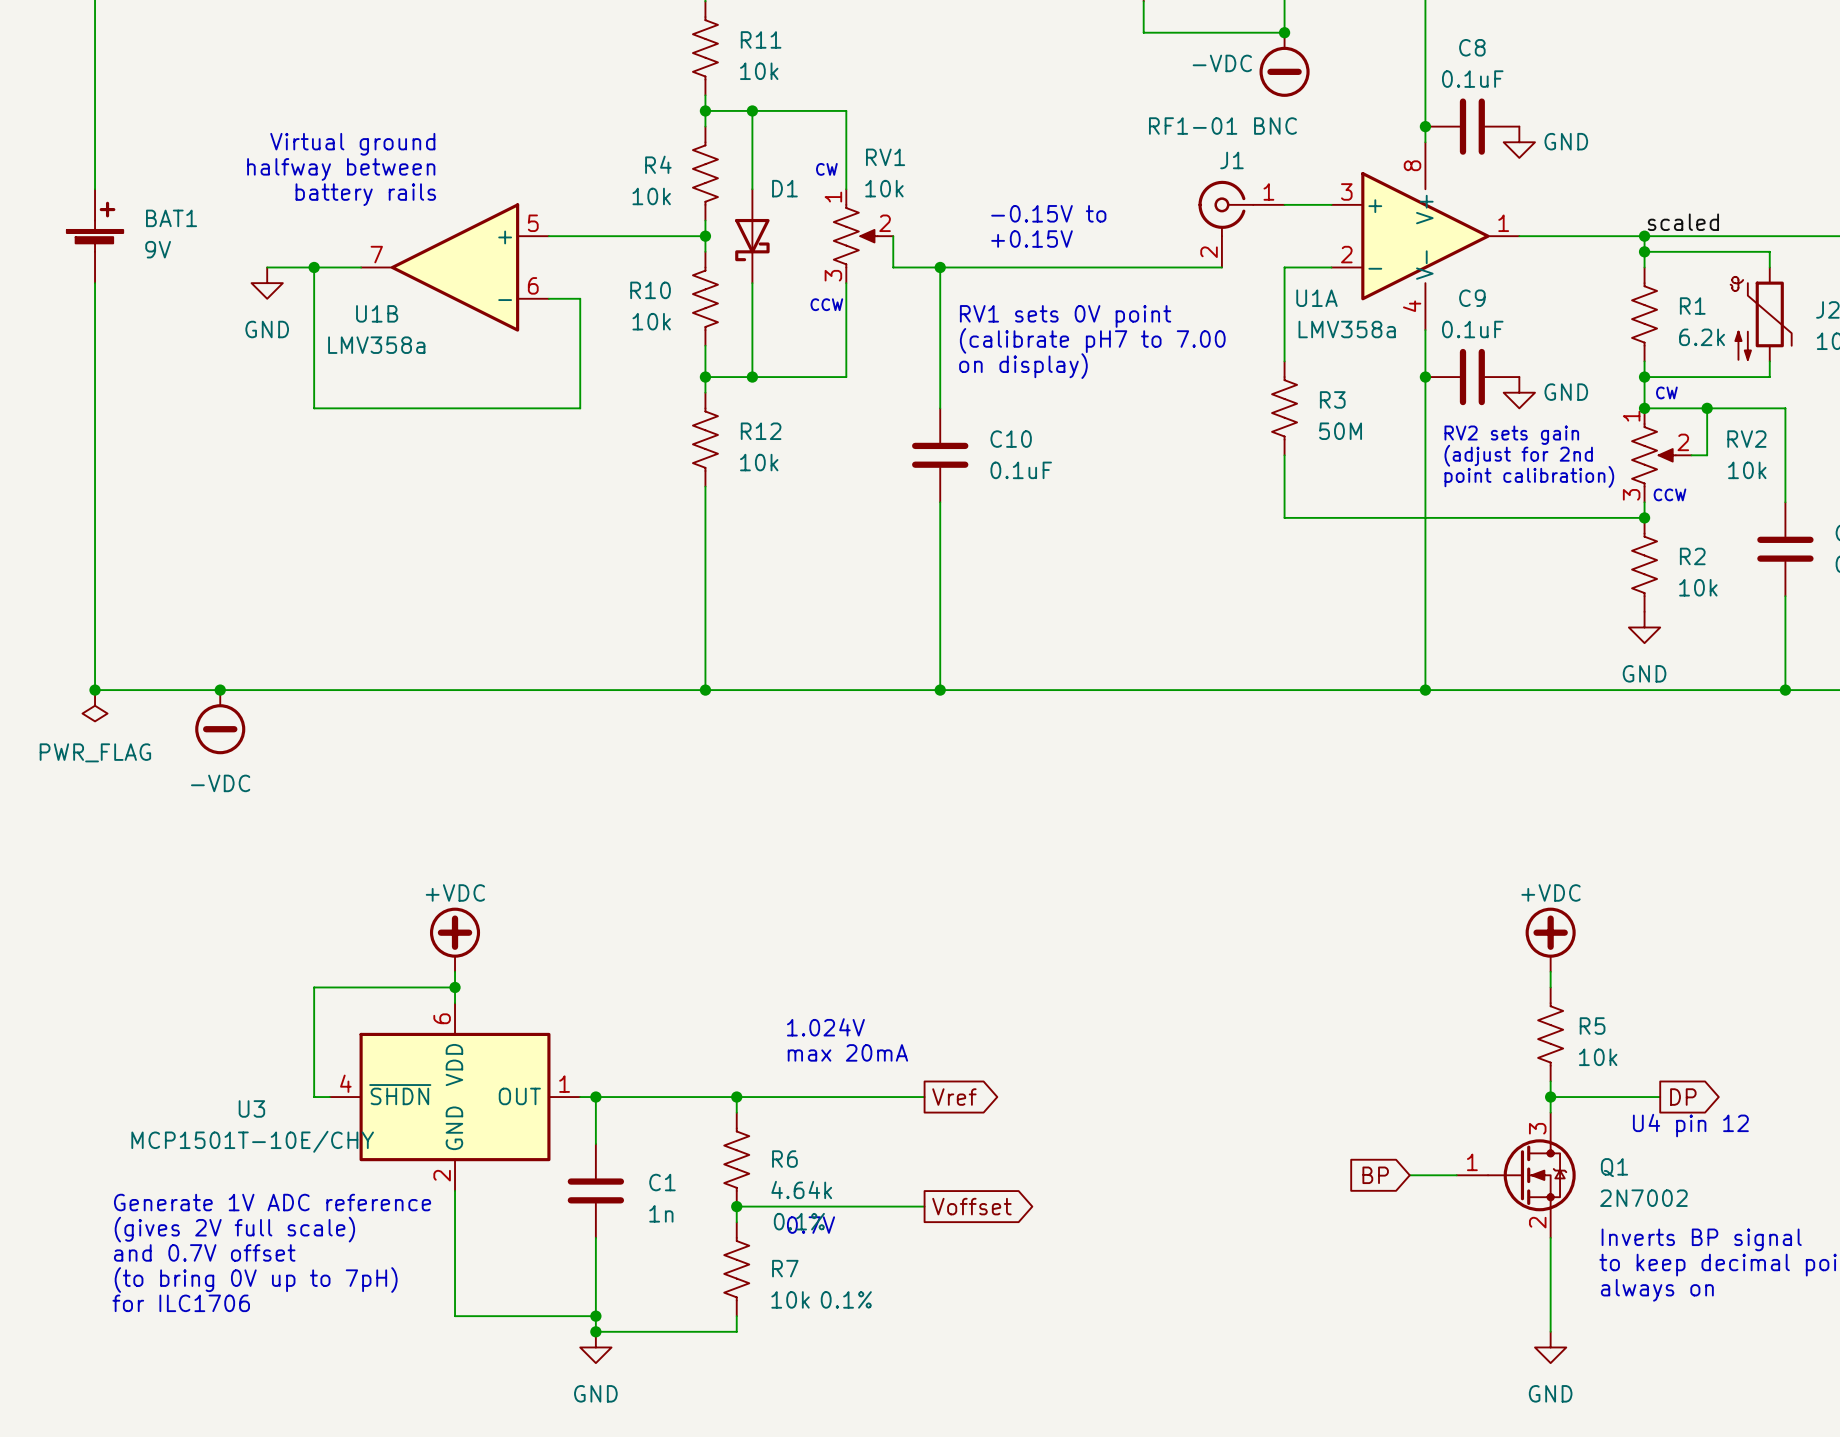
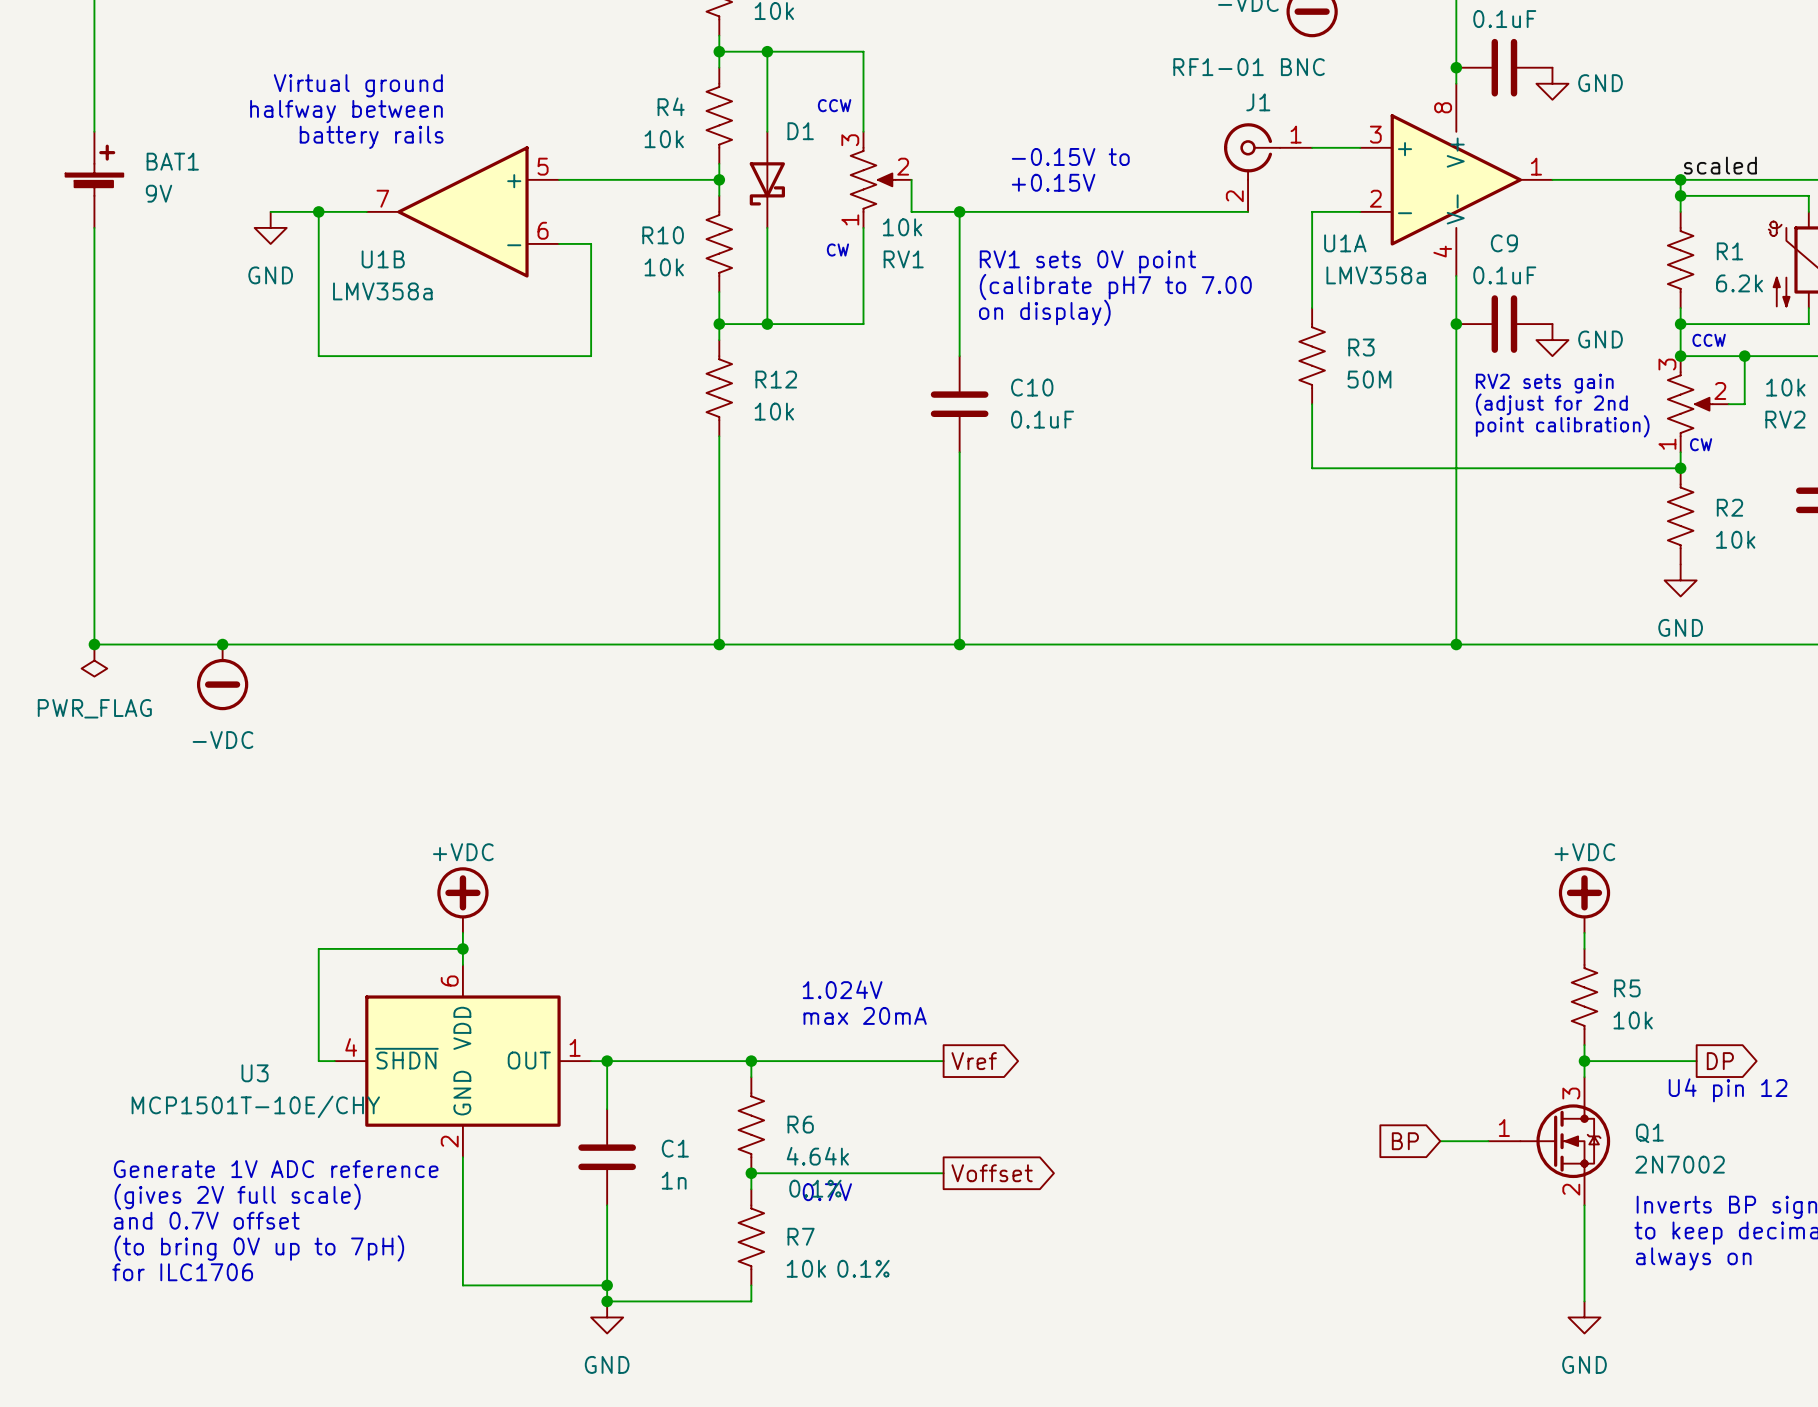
text: CW (826, 169) -> CCW (834, 105)
RV1 flip: as is (855, 236) -> up-down (873, 179)
text: CCW (826, 304) -> CW (837, 250)
text: CW (1666, 392) -> CCW (1709, 340)
RV2 flip: as is (1653, 455) -> up-down (1690, 404)
text: CCW (1669, 494) -> CW (1701, 444)

